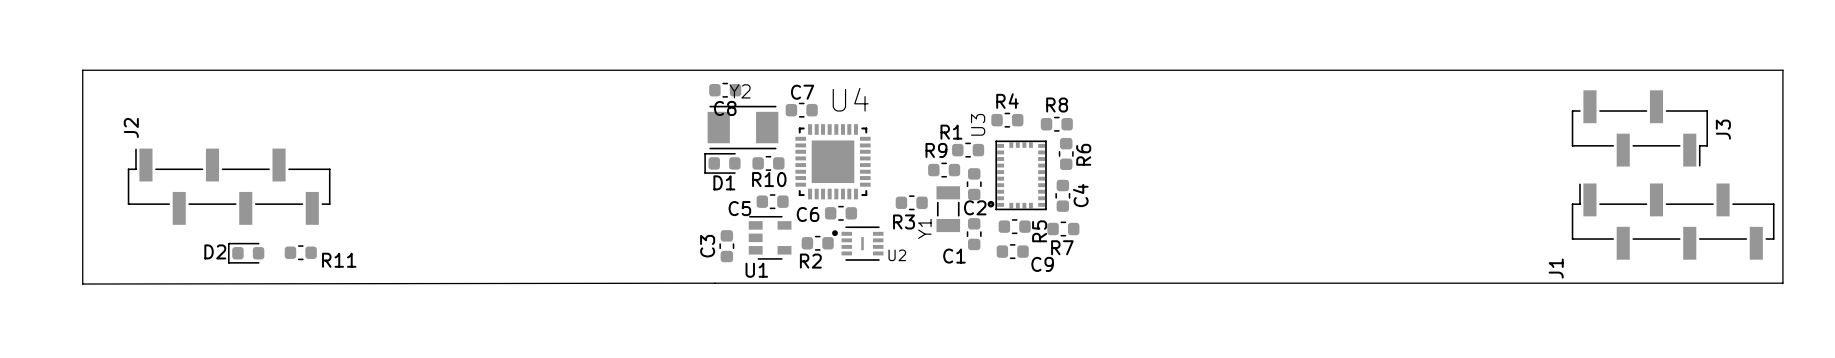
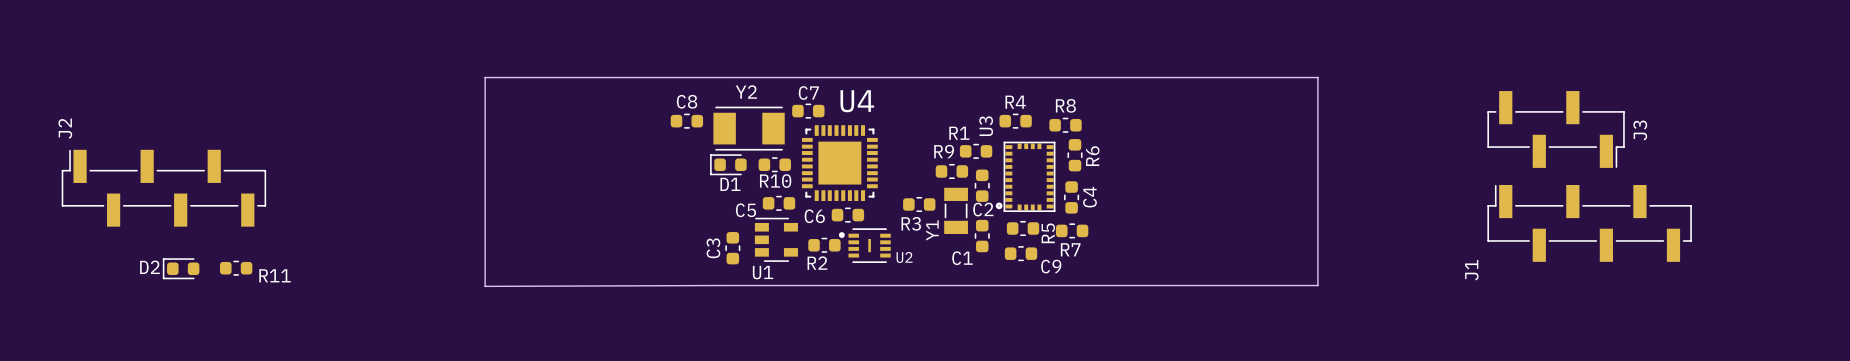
C8 position: (725, 90) -> (686, 121)
C8 name position: C8 (725, 108) -> C8 (687, 101)
J3 position: (1639, 128) -> (1556, 129)
J2 position: (229, 186) -> (163, 188)
J1 position: (1673, 221) -> (1589, 223)
R11 position: (300, 252) -> (236, 268)
D2 position: (246, 253) -> (181, 268)
board edge: (714, 283) (82, 284) (82, 70) (1782, 70) (1782, 283) (1307, 283) -> (720, 285) (485, 286) (485, 77) (1317, 77) (1317, 285)

